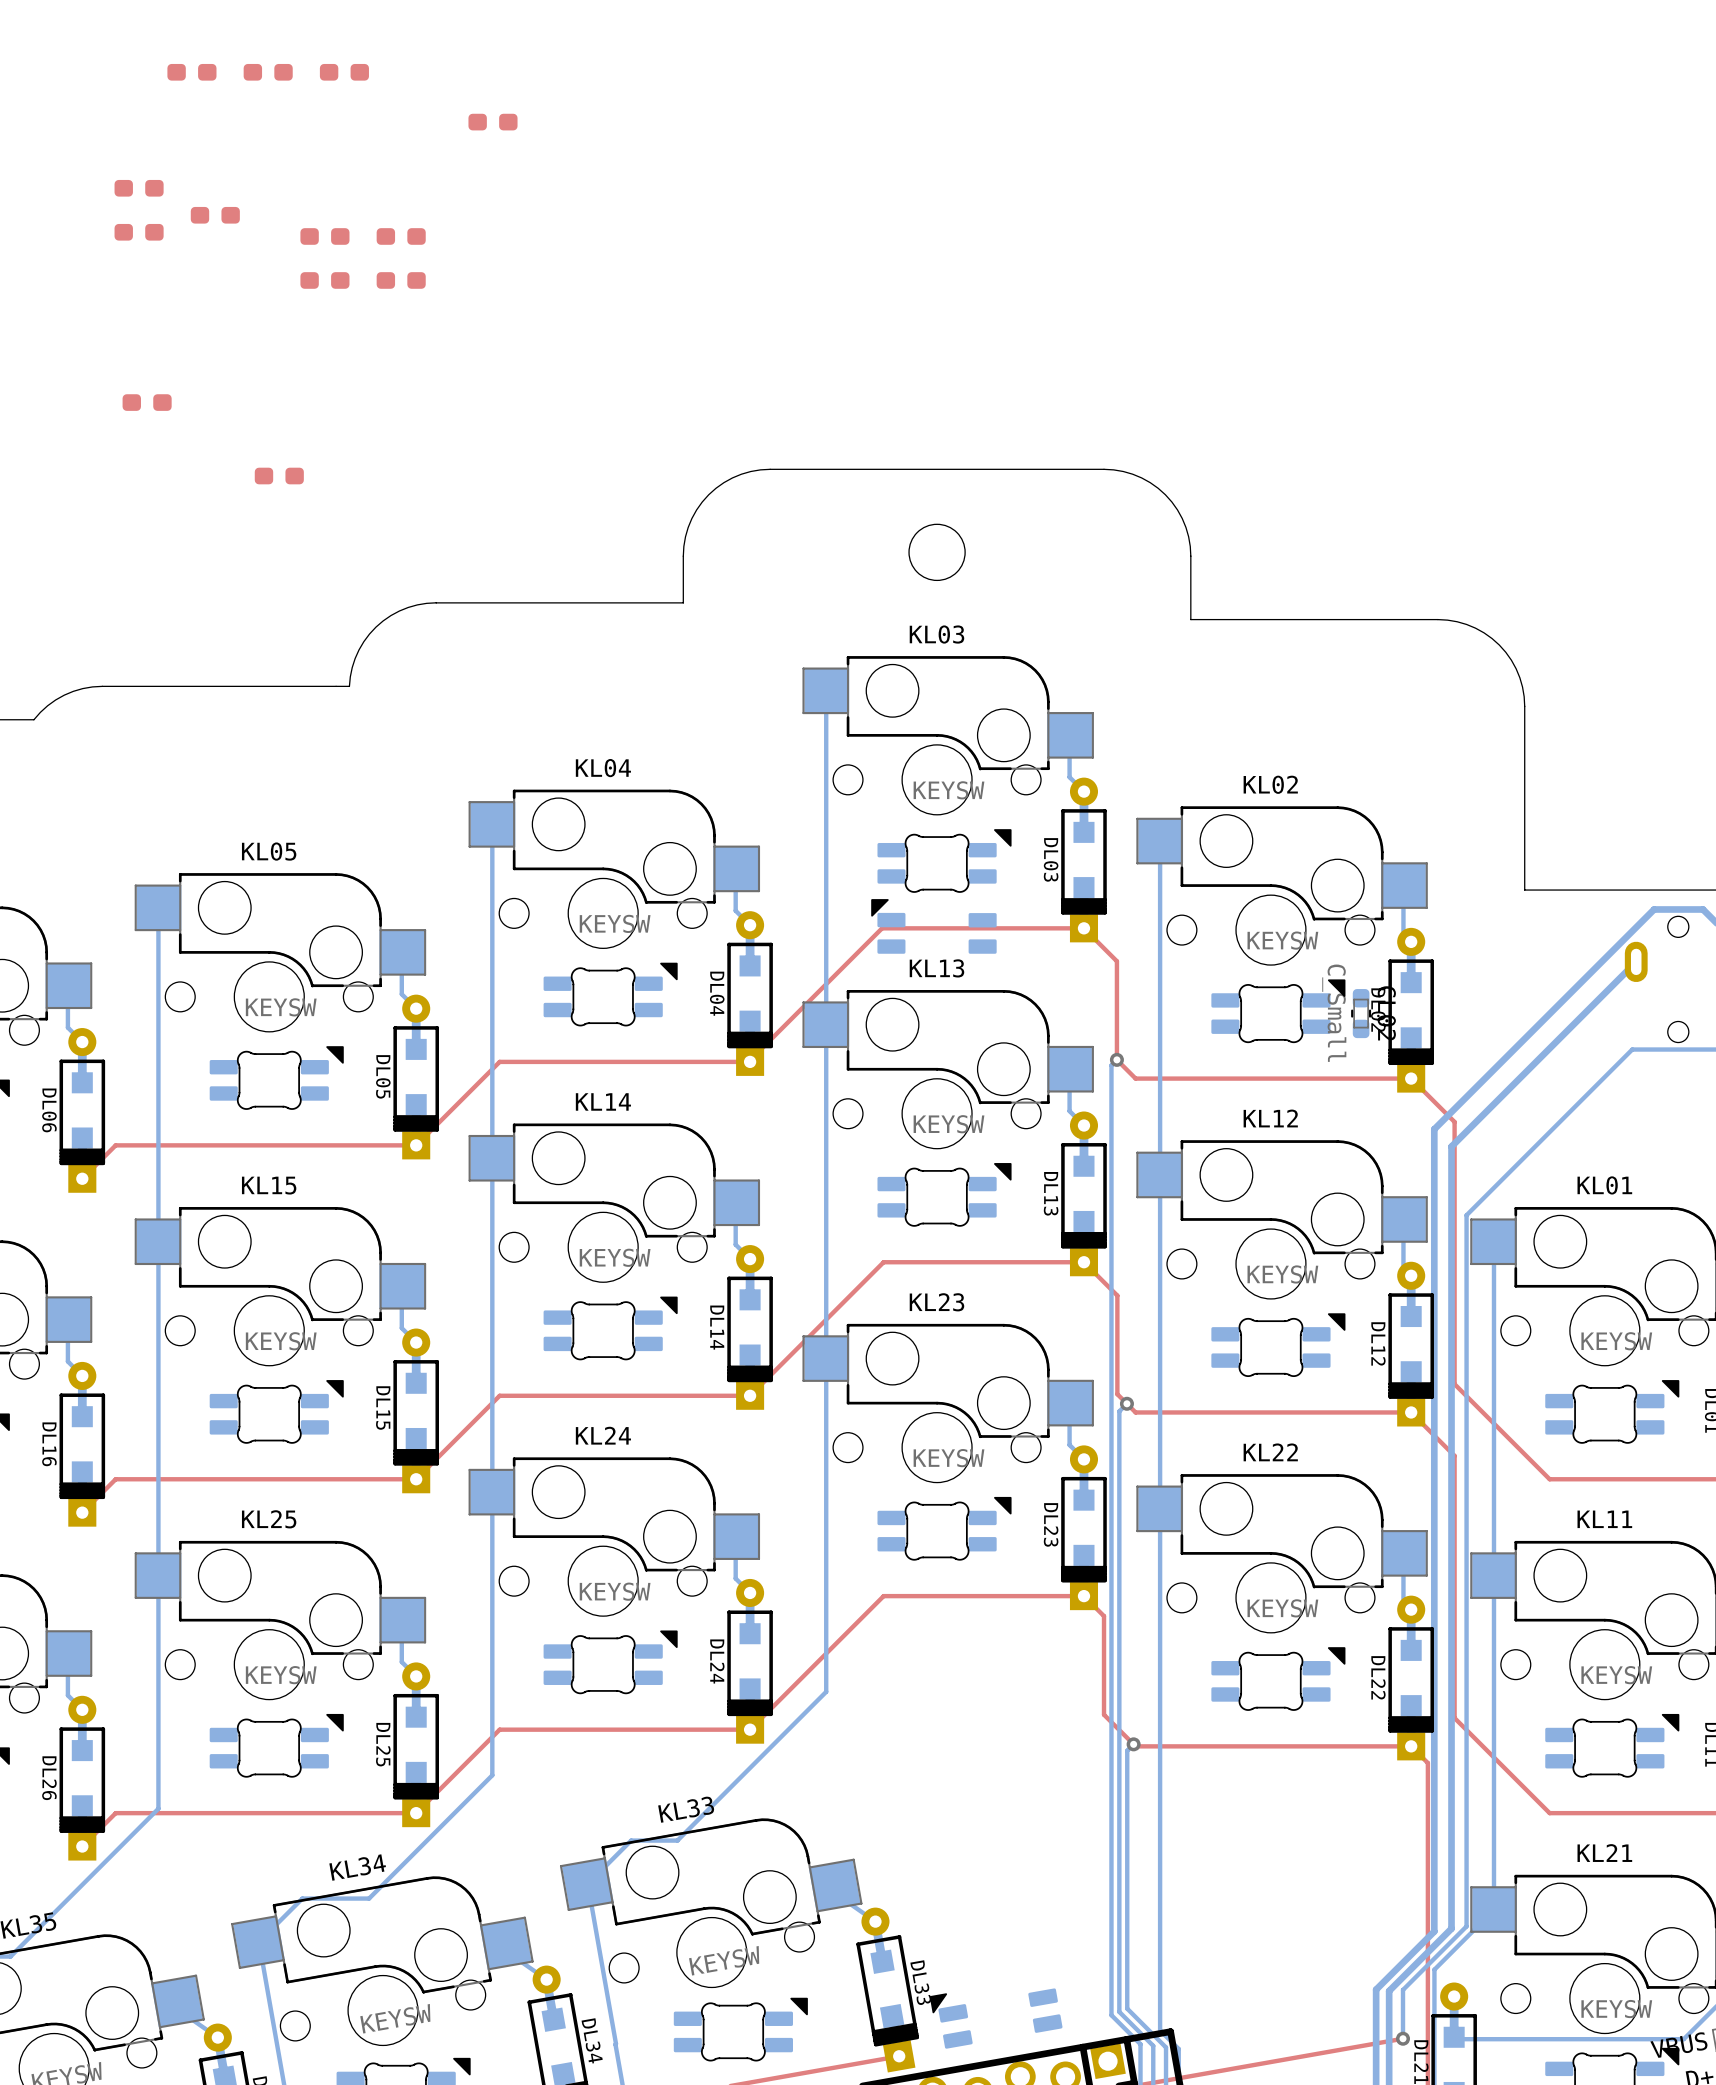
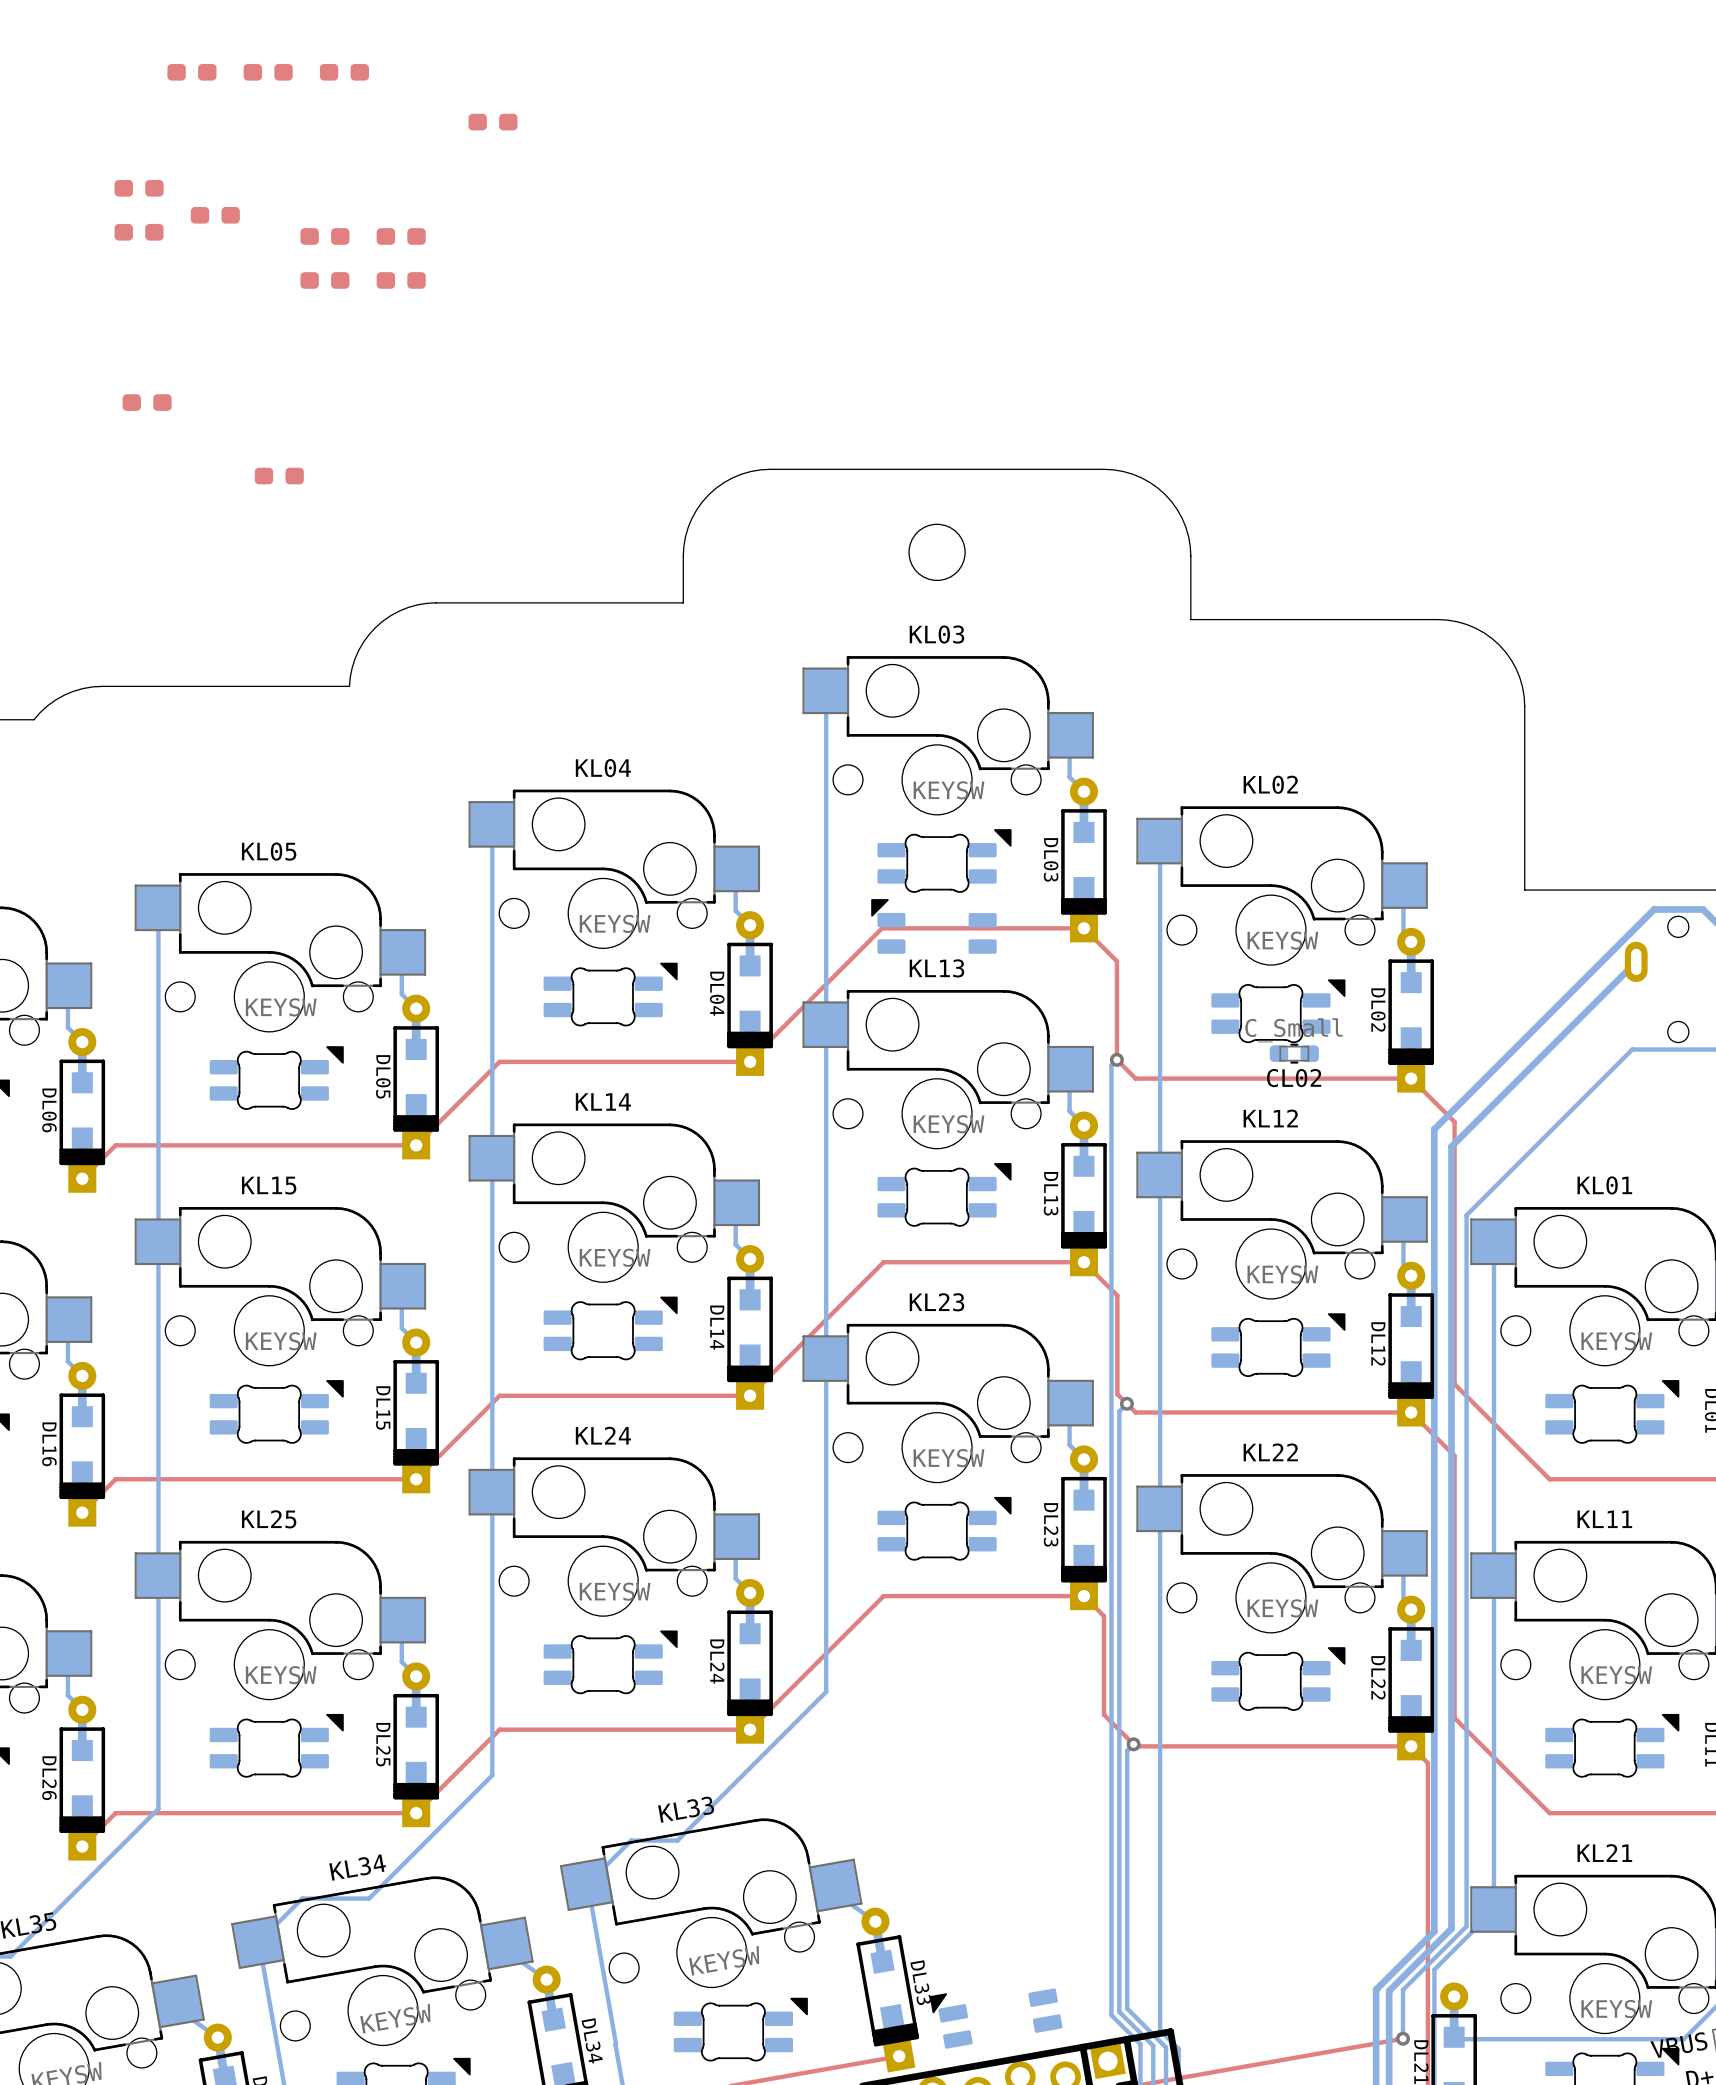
CL02 rotation: 0° (1361, 1013) -> 90° clockwise (1294, 1053)
CL02 position: (1361, 1013) -> (1294, 1053)

